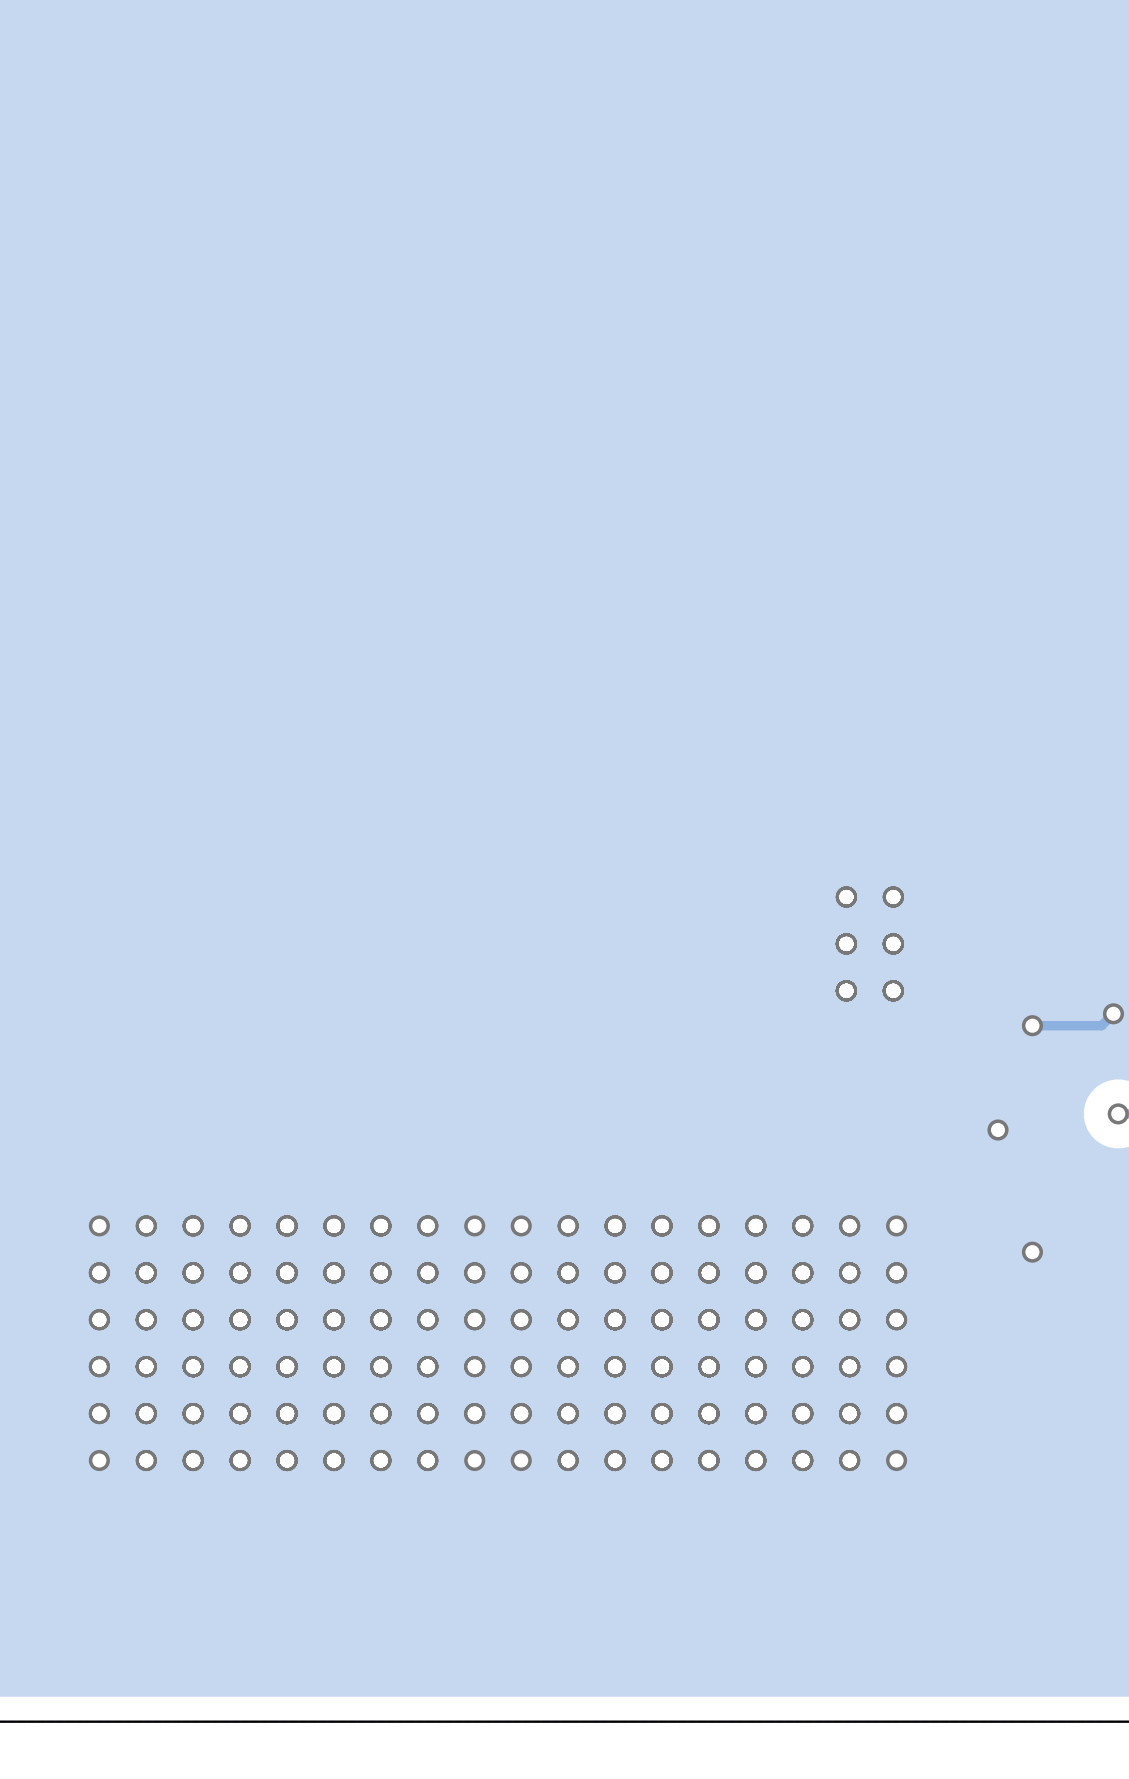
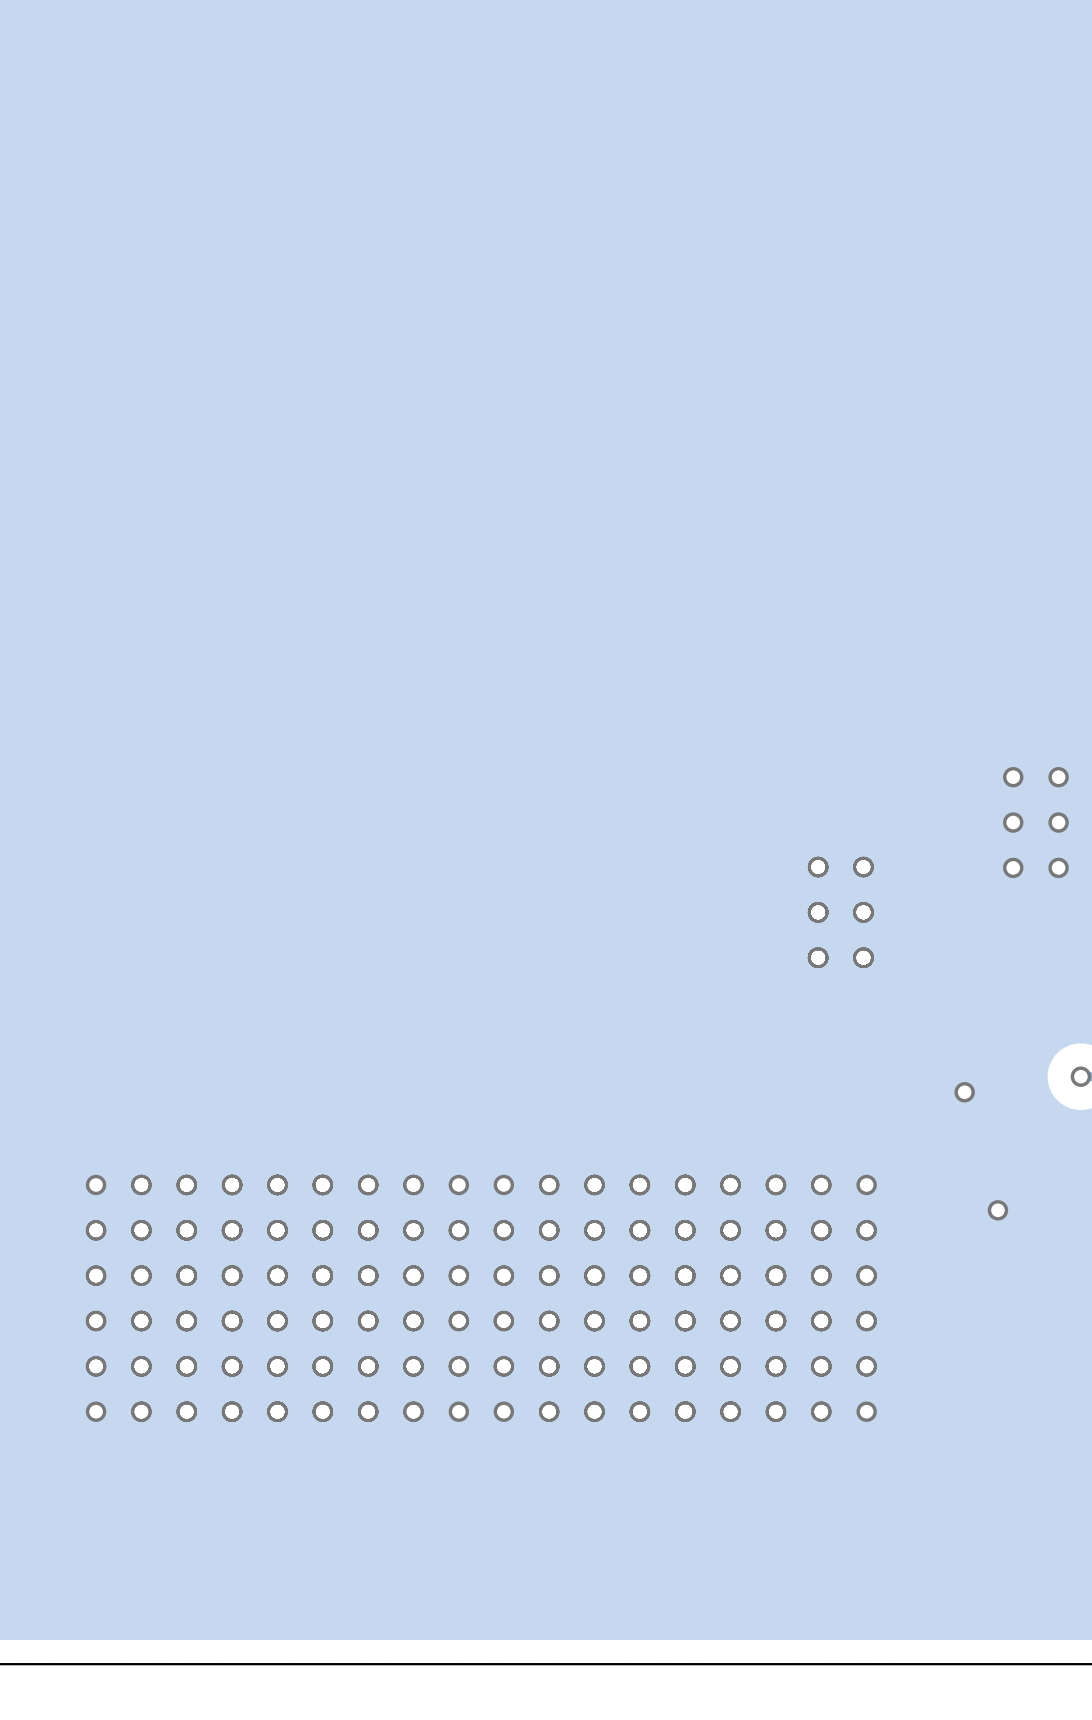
via: none -> (1013, 777)
via: none -> (1058, 777)
via: none -> (1013, 822)
via: none -> (1058, 822)
via: none -> (1013, 867)
via: none -> (1058, 867)
track: (1113, 1013) (1101, 1025) (1032, 1025) -> none
via: (1113, 1013) -> none
via: (1032, 1025) -> none

